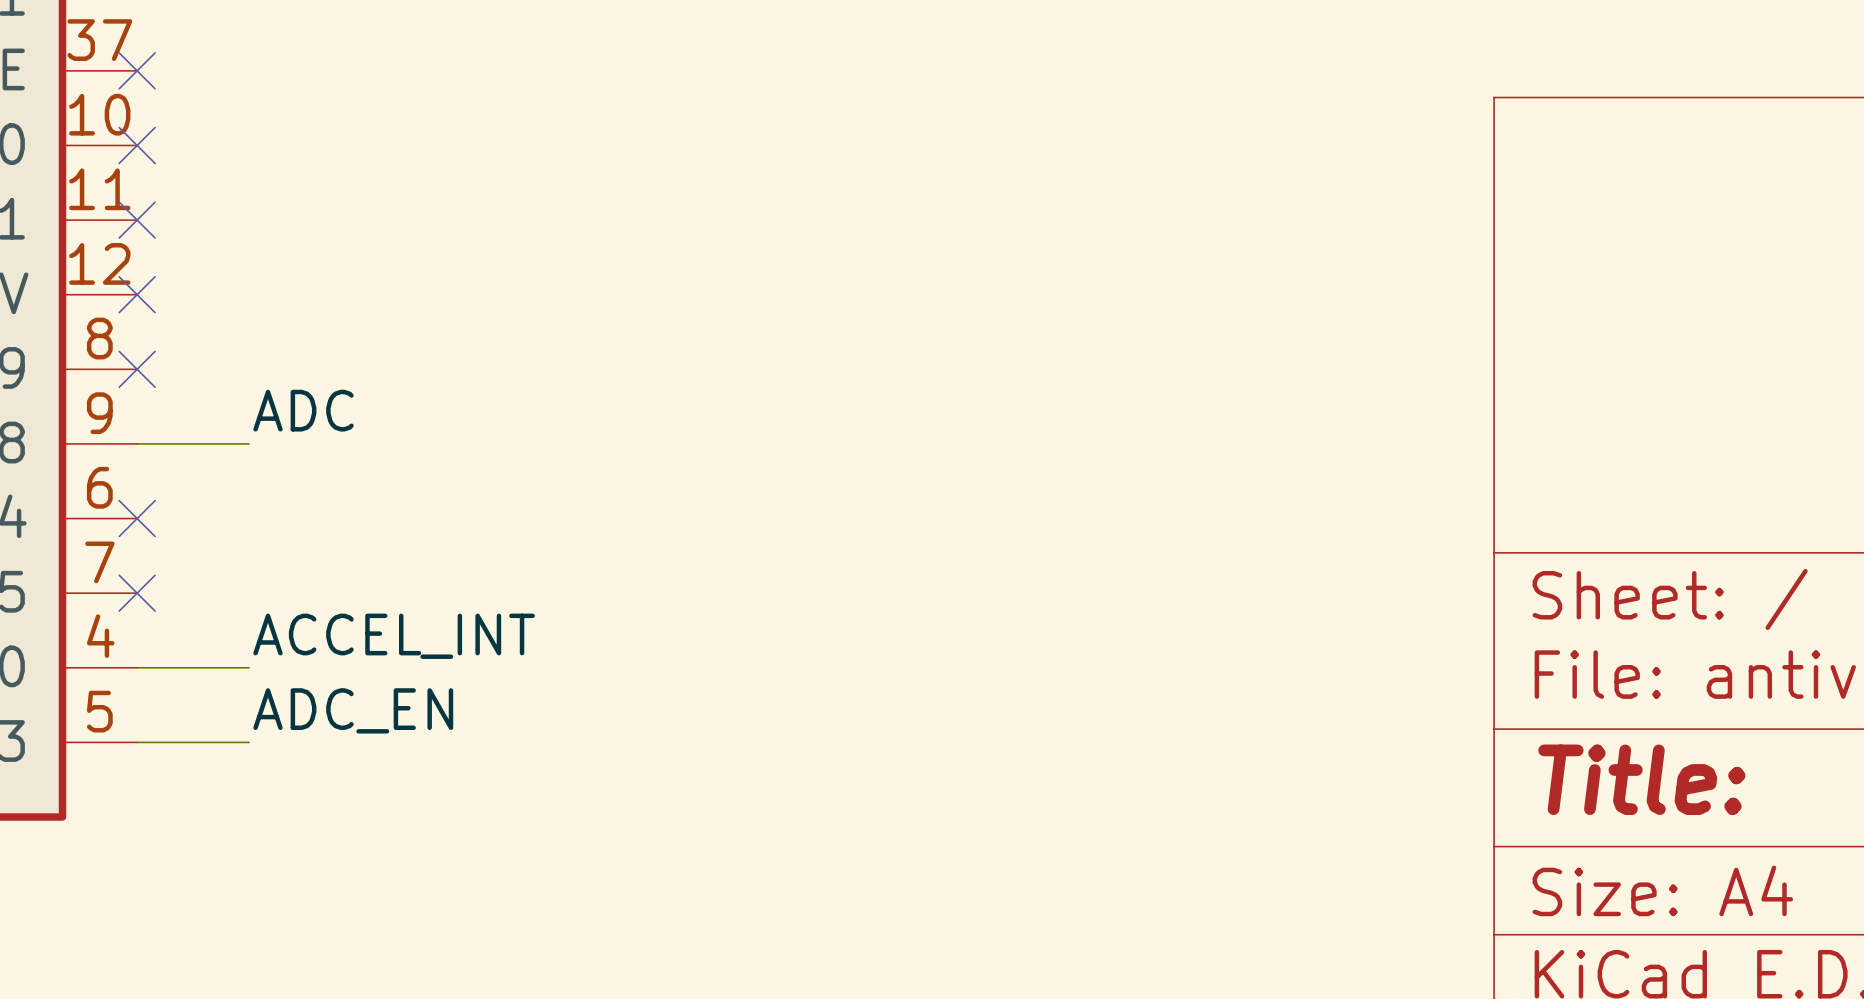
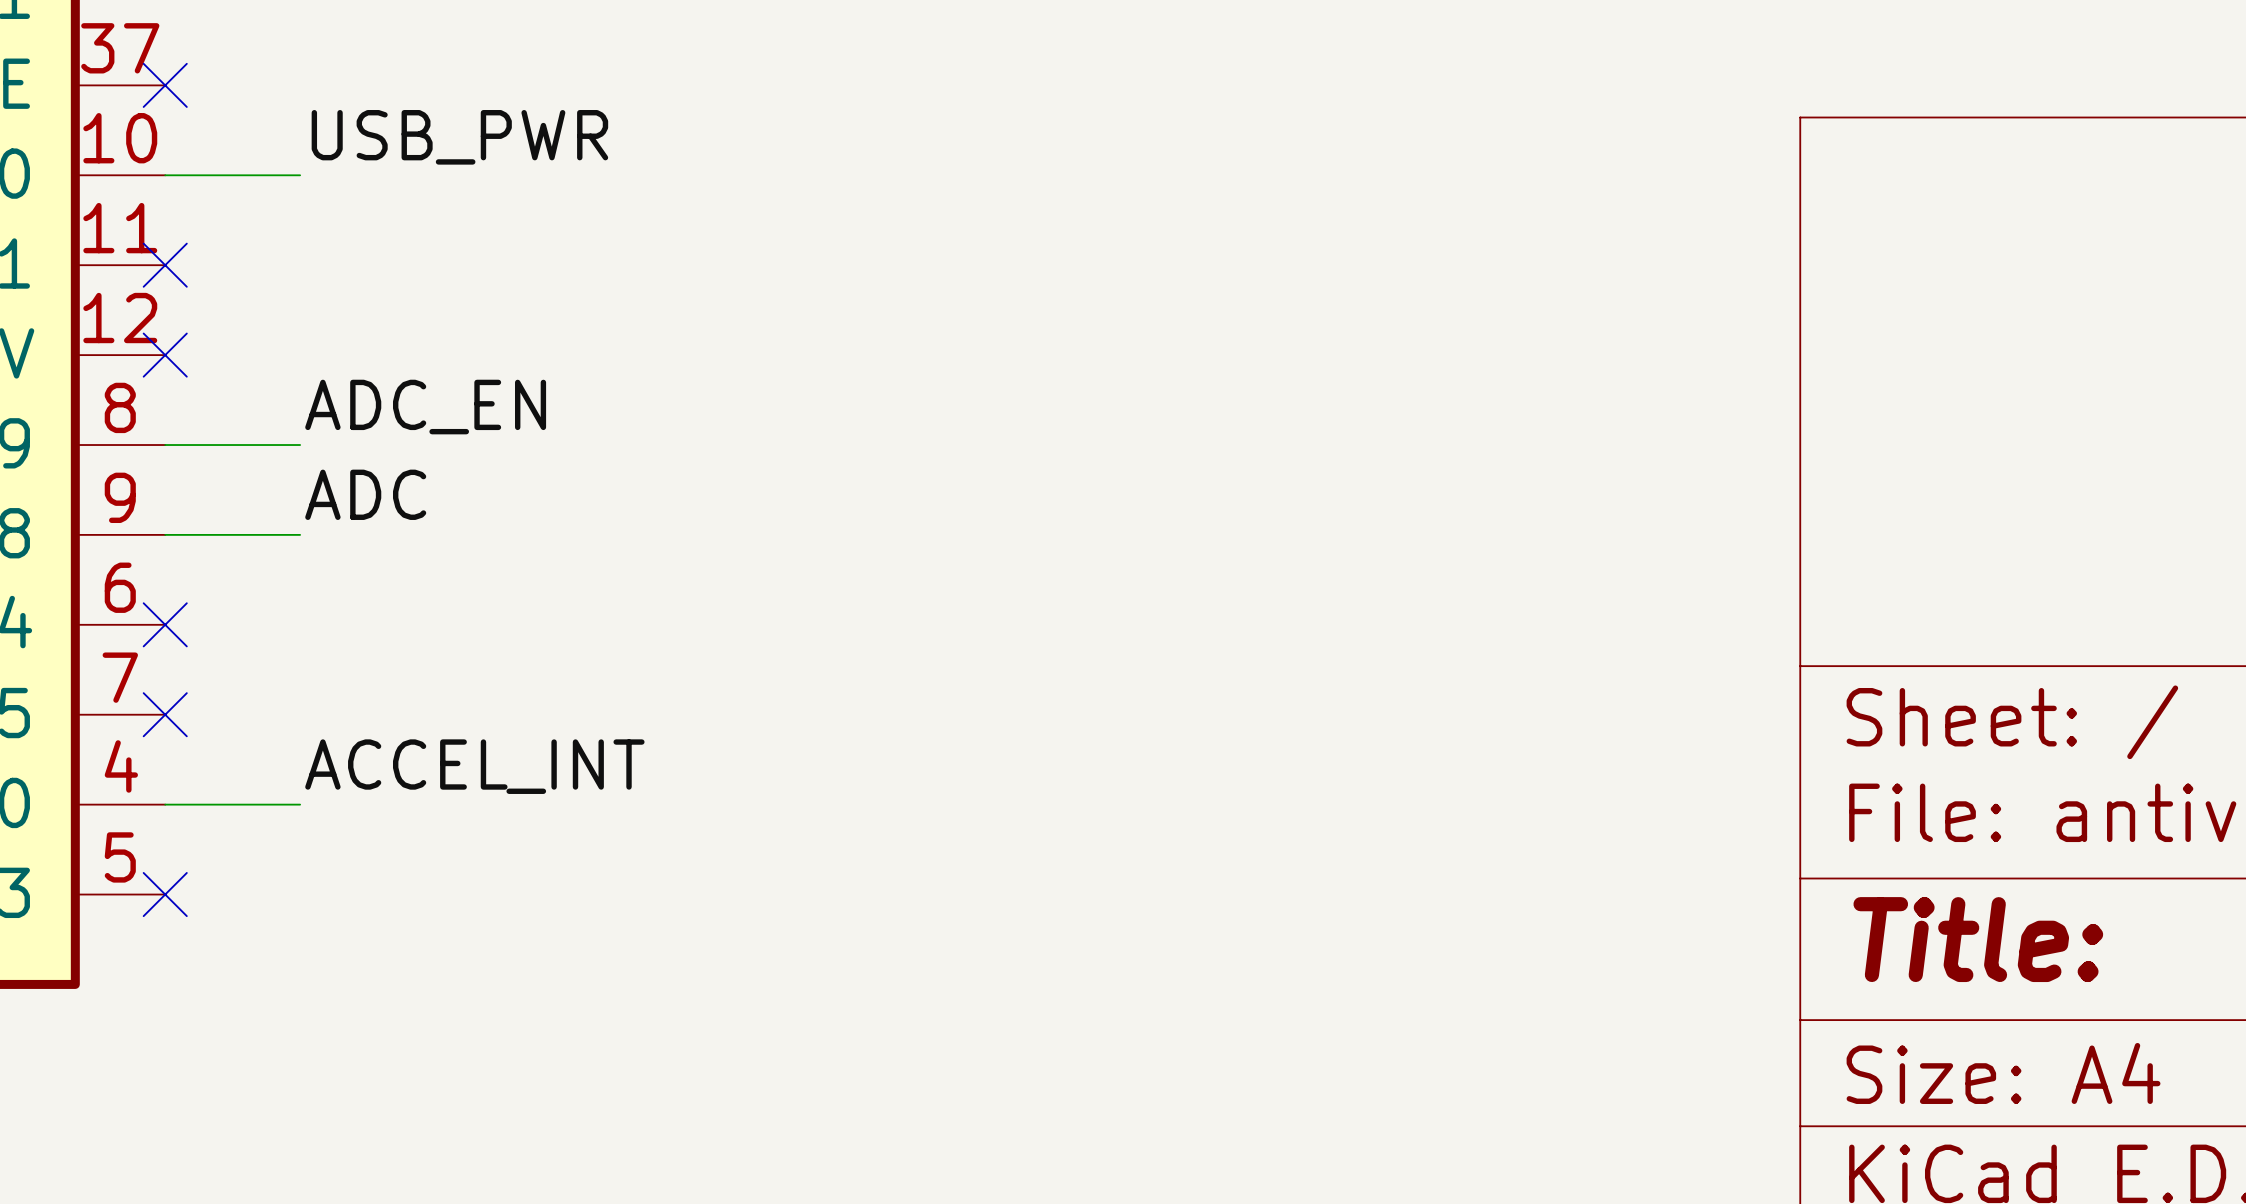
label: none -> USB_PWR (459, 137)
wire: none -> (165, 175) (300, 175)
no-connect mark: (137, 145) -> none
no-connect mark: (137, 369) -> none
label position: ADC_EN (353, 710) -> ADC_EN (425, 407)
wire: (137, 742) (249, 742) -> (165, 445) (300, 445)
no-connect mark: none -> (165, 894)

